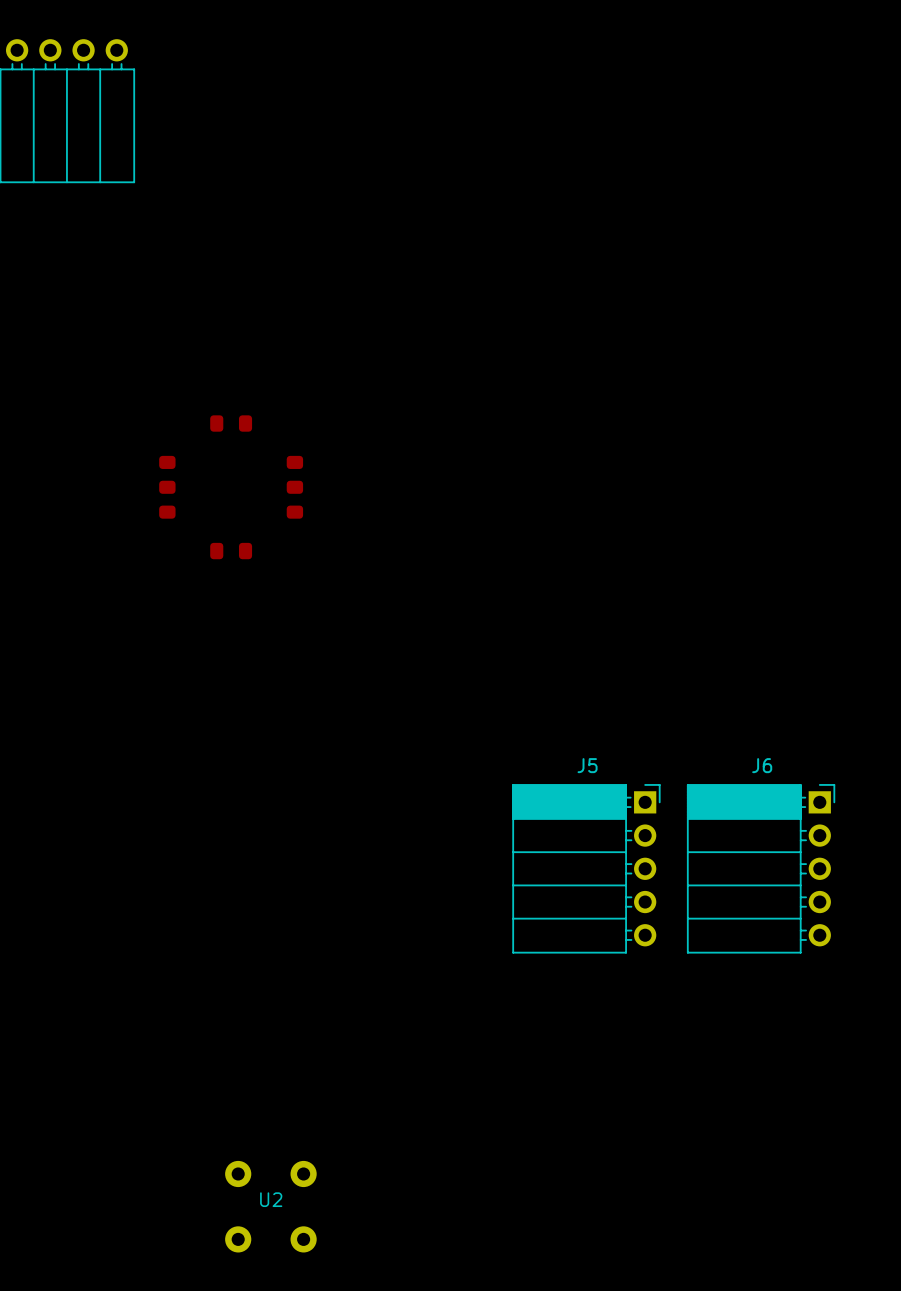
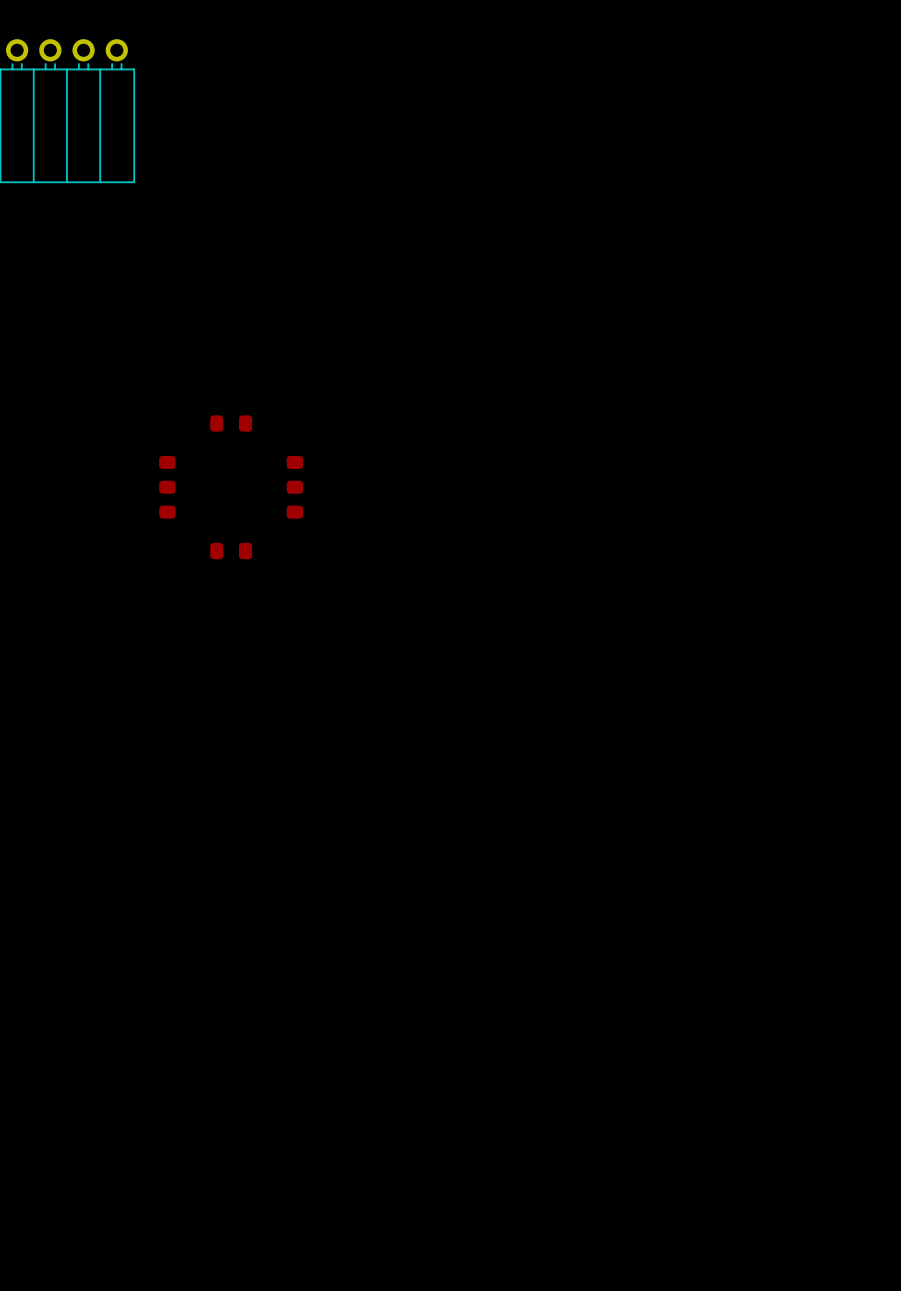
J5: (586, 868) -> none
J6: (761, 868) -> none
U2: (270, 1206) -> none

